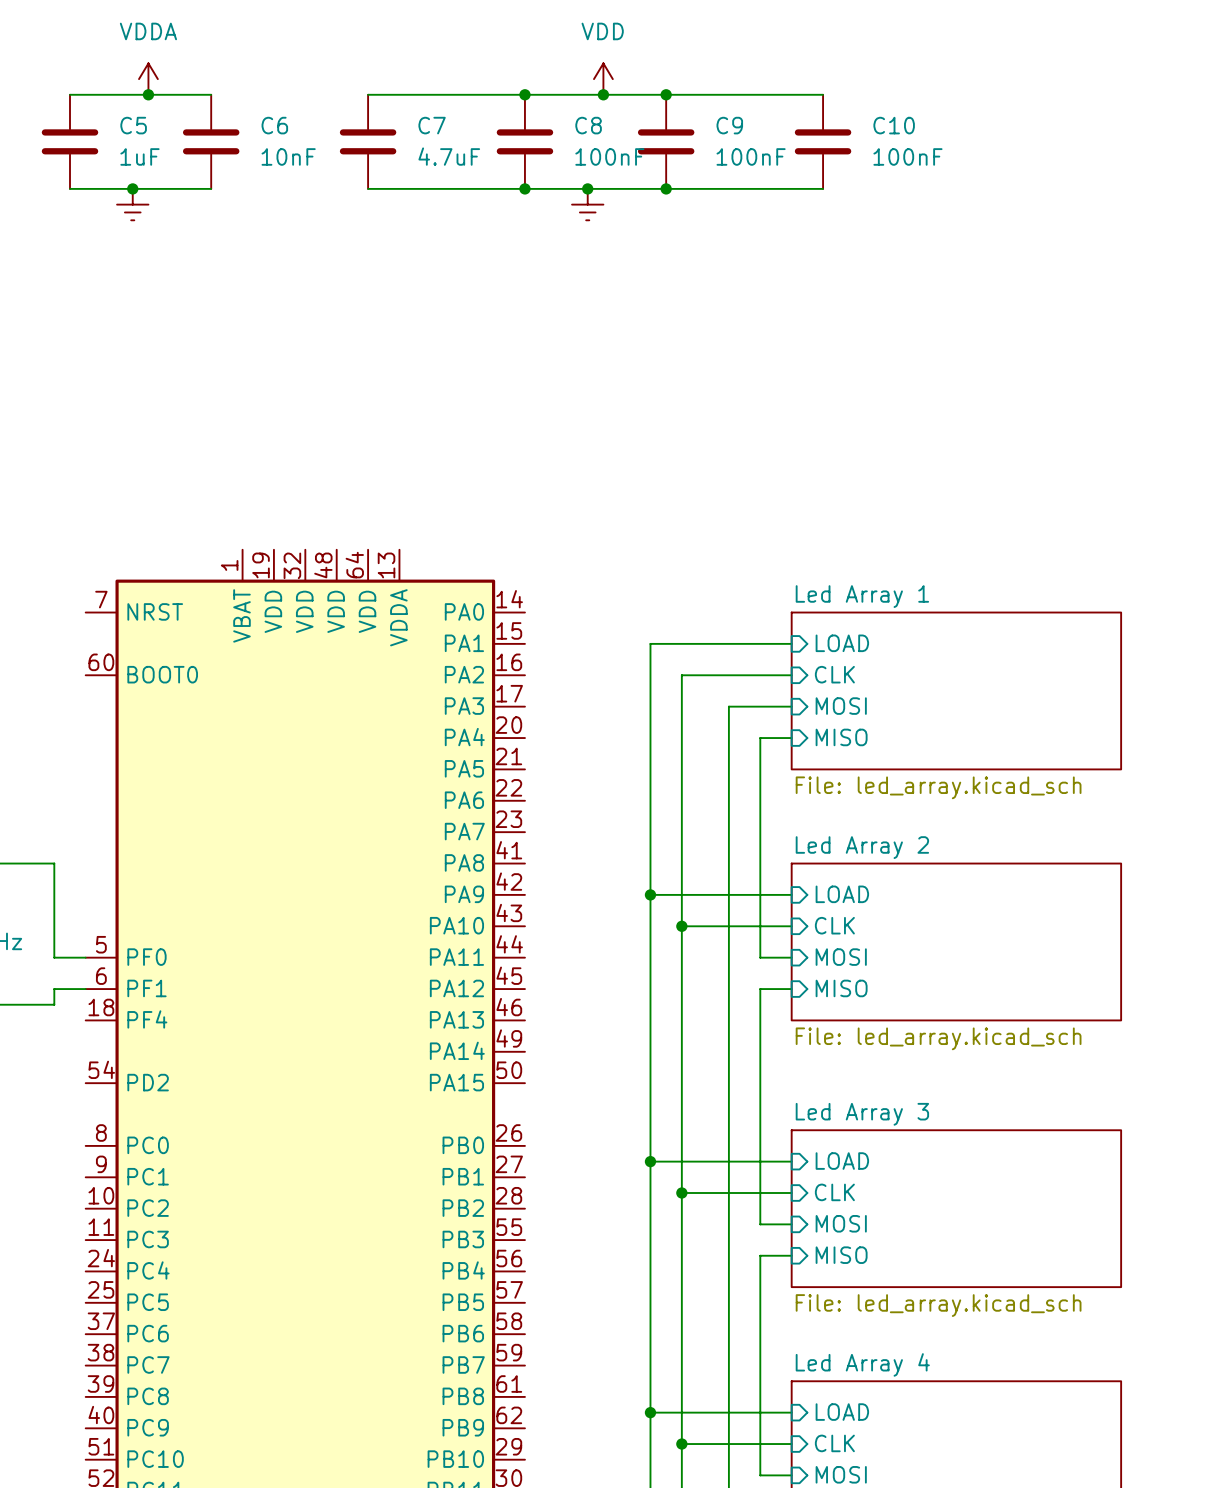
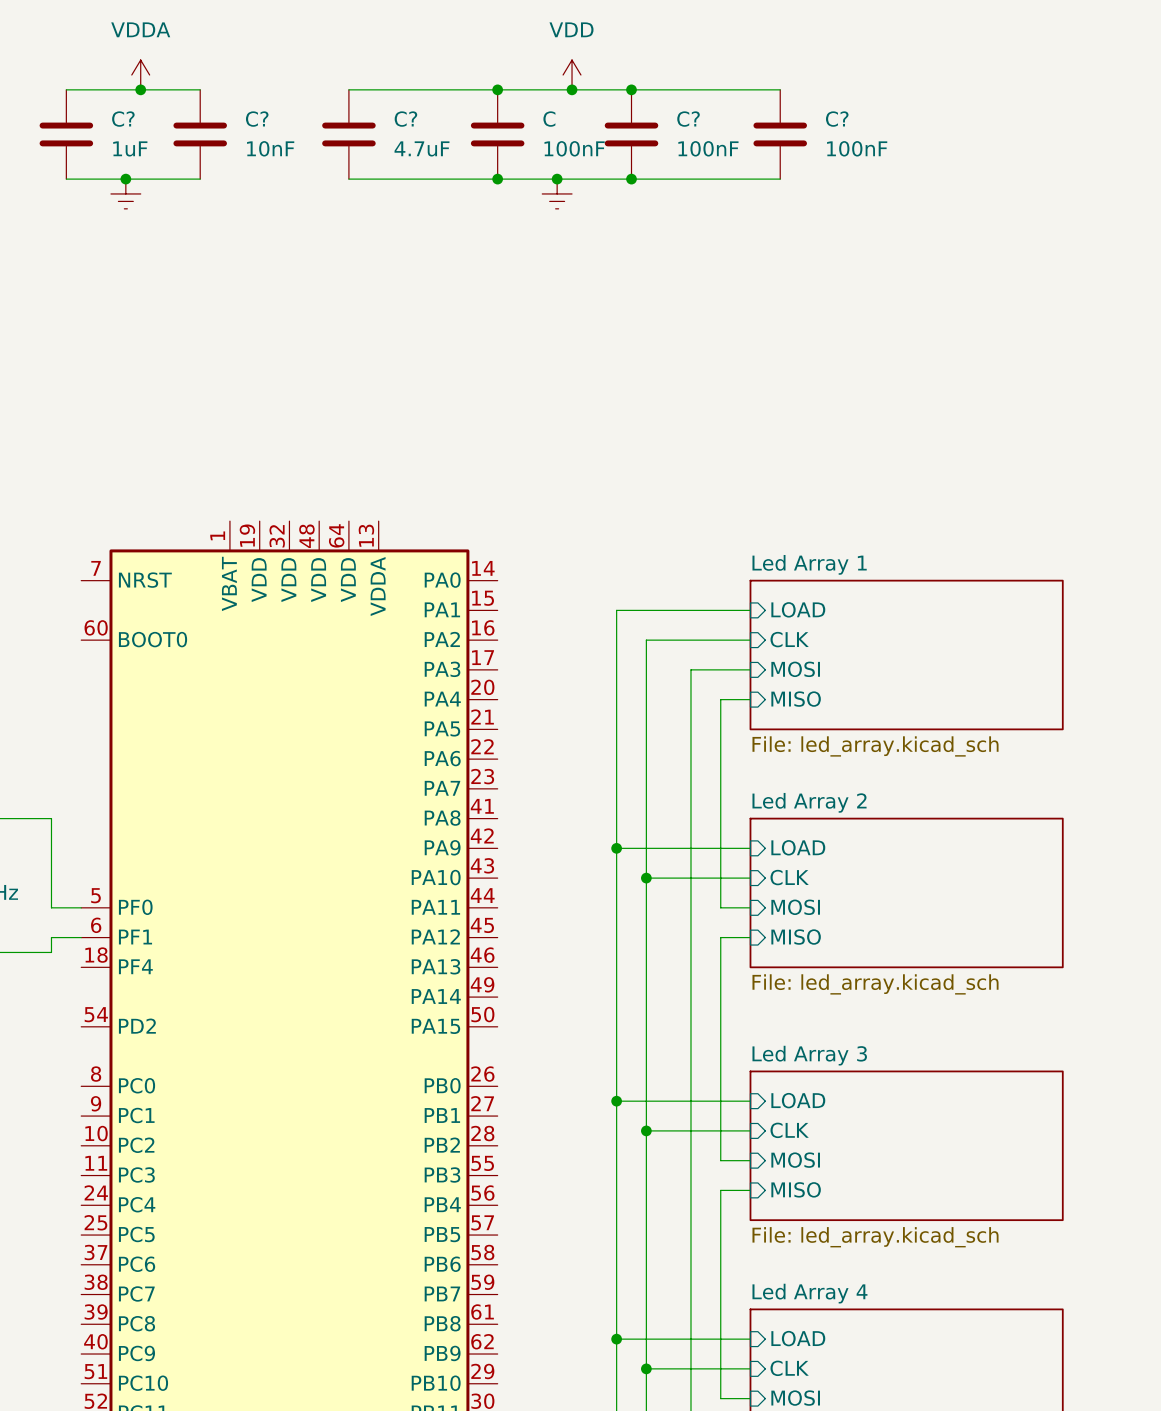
C5 name: C5 (133, 125) -> C? (123, 119)
C6 name: C6 (274, 125) -> C? (257, 119)
C7 name: C7 (432, 125) -> C? (405, 119)
C8 name: C8 (588, 125) -> C (549, 119)
C9 name: C9 (729, 125) -> C? (688, 119)
C10 name: C10 (894, 125) -> C? (837, 119)

